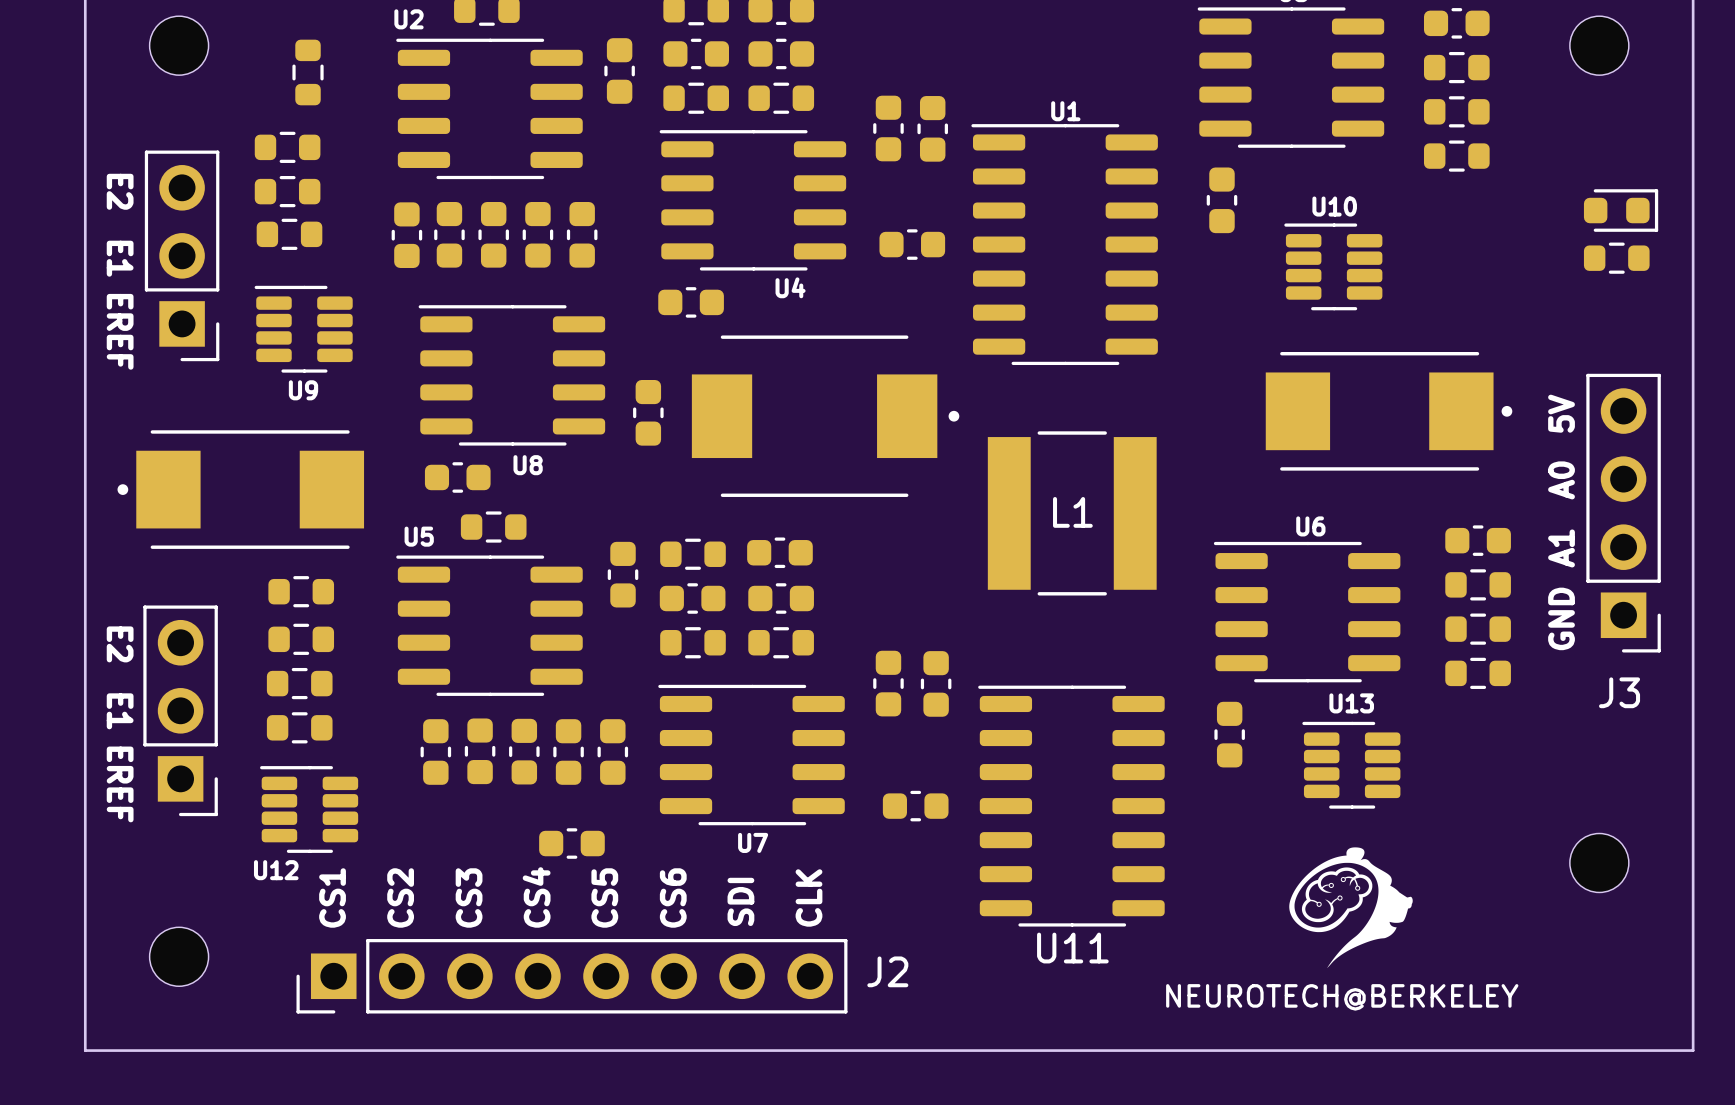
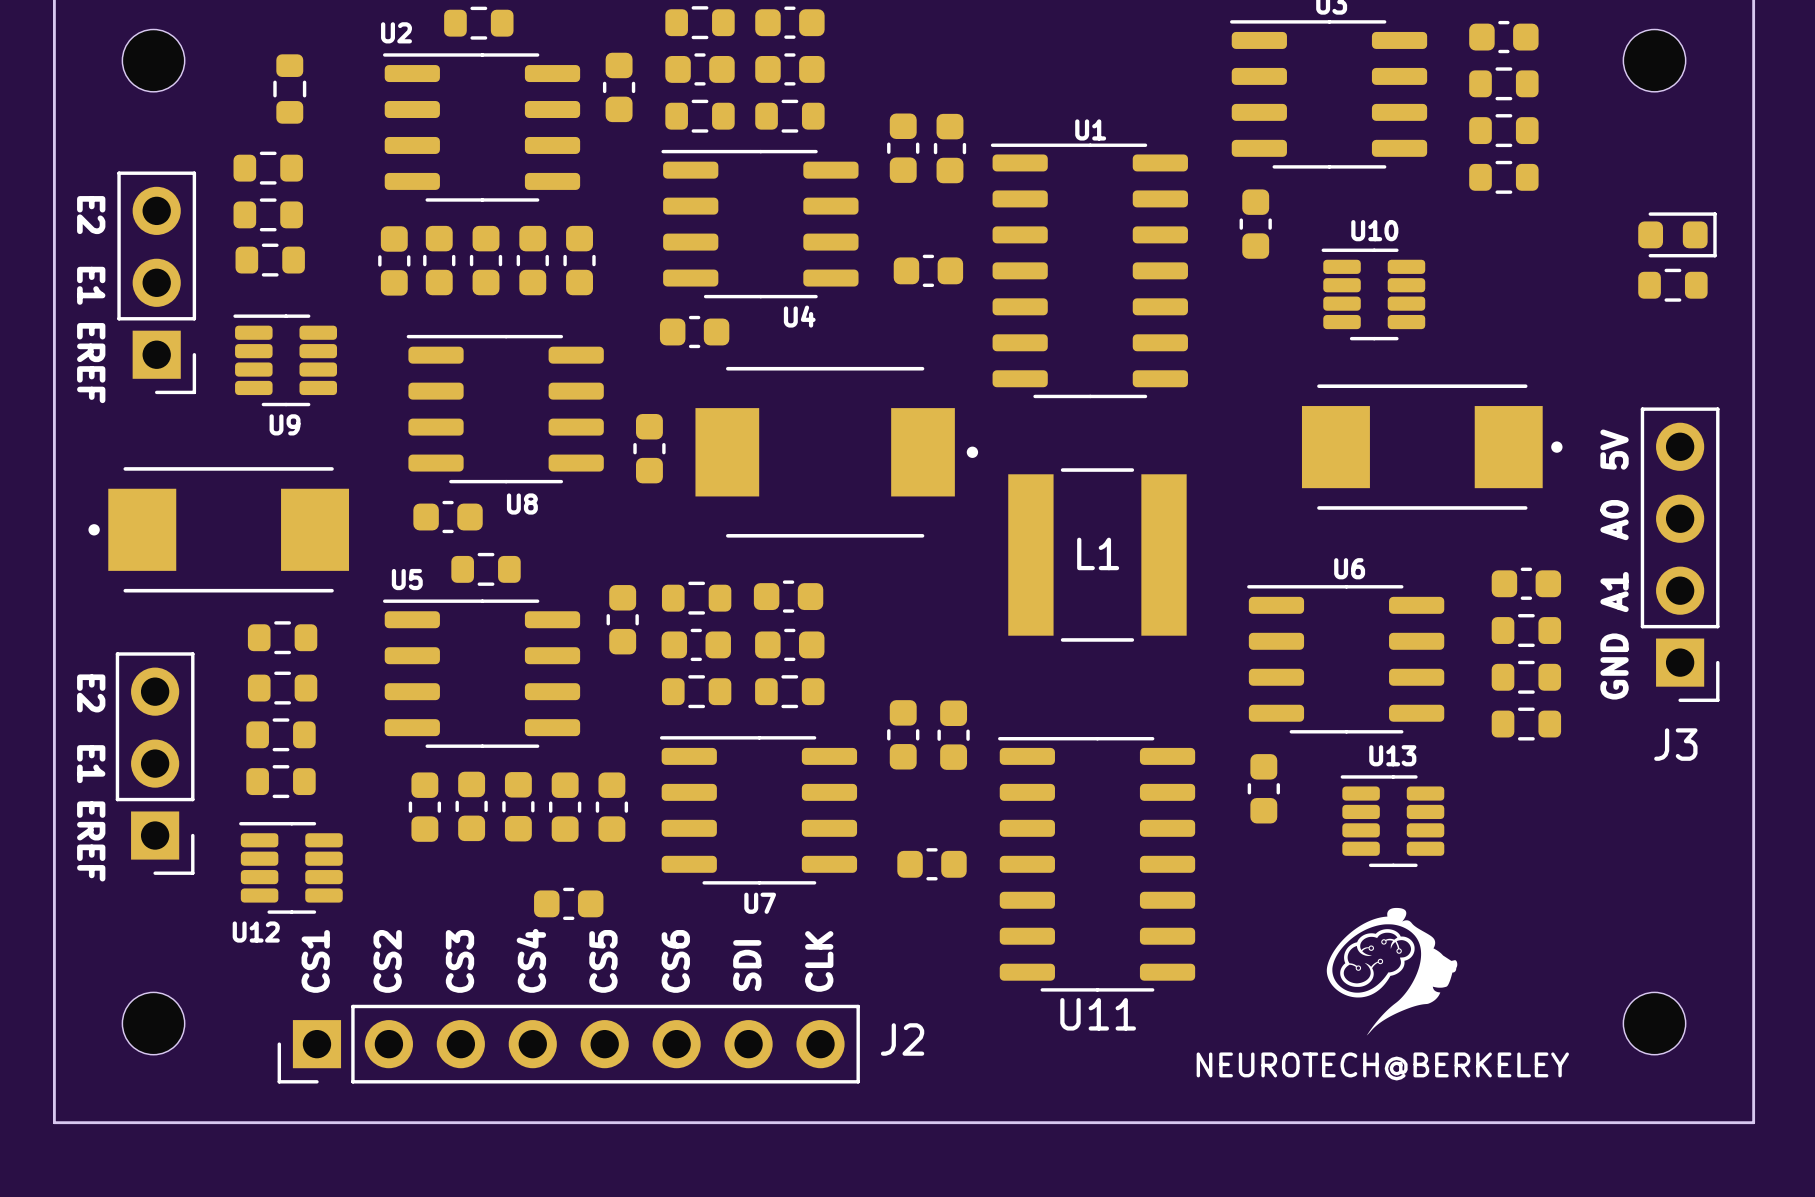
part position: (1599, 862) -> (1654, 1023)

